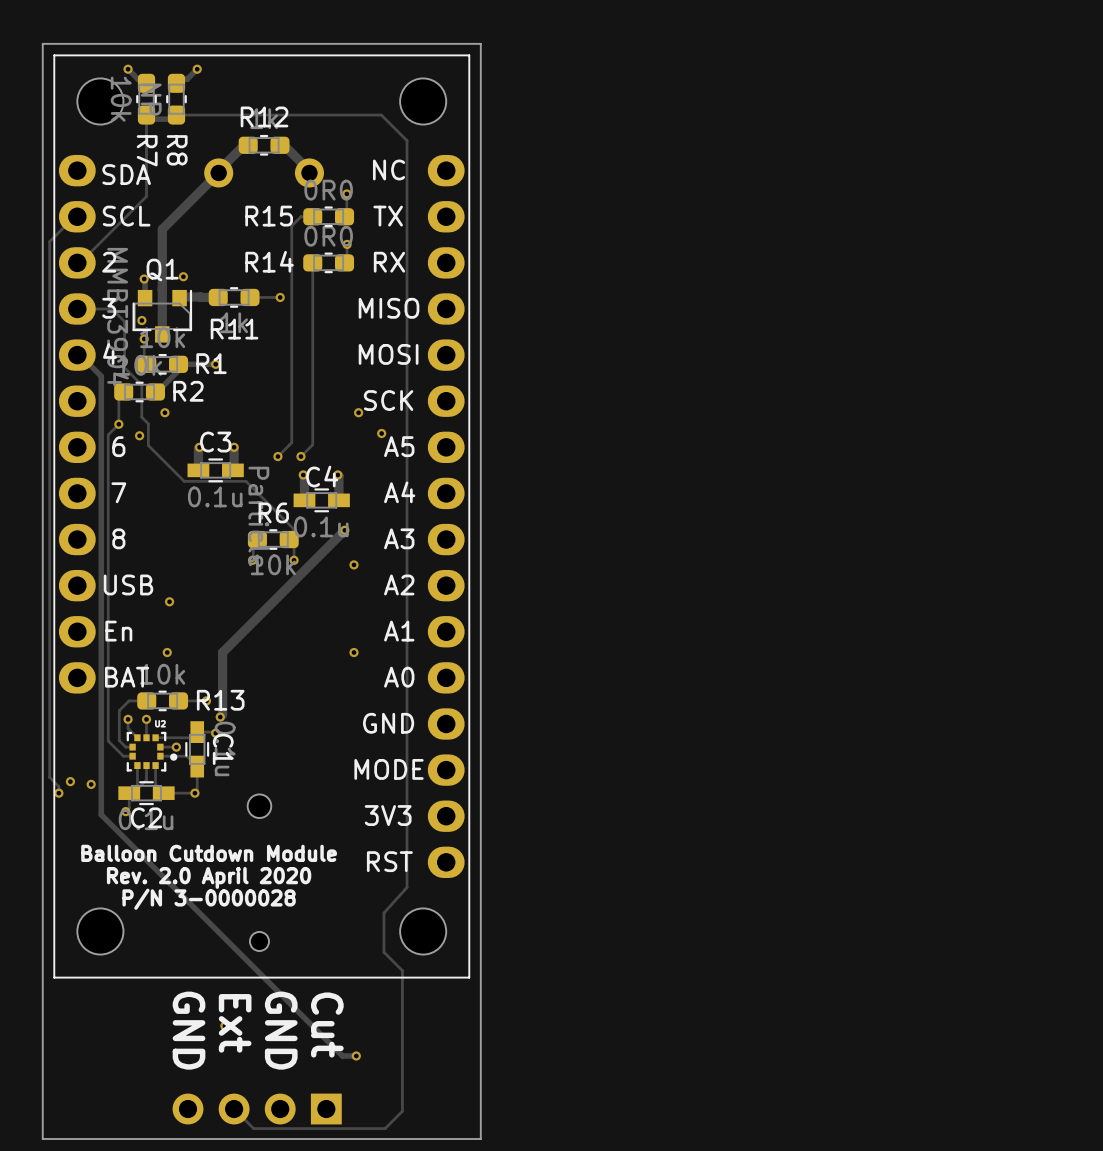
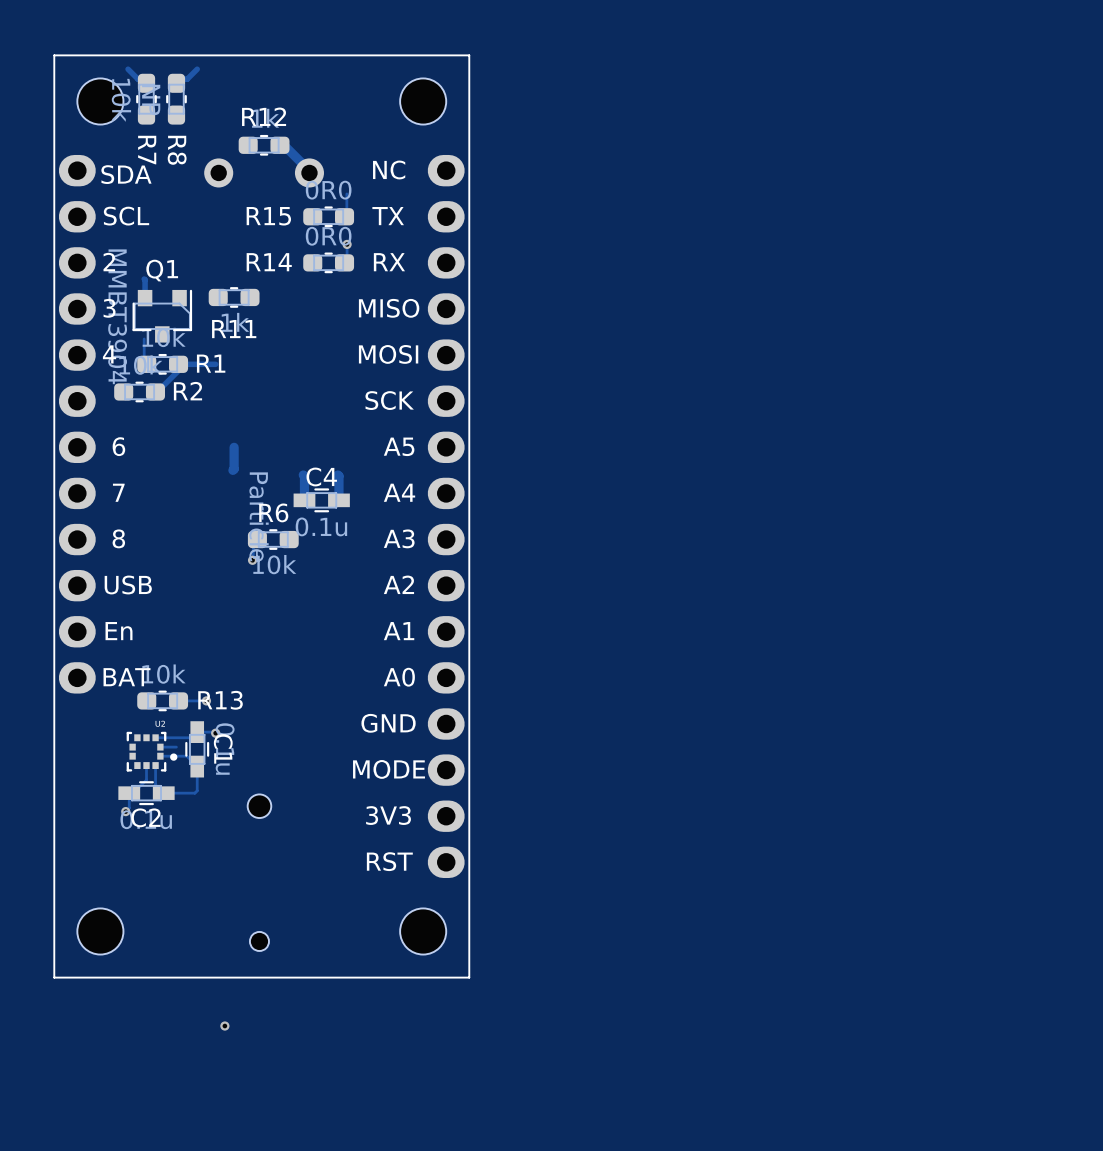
board edge: (480, 43) (480, 1138) (42, 1138) (42, 43) (480, 43) -> none
via: (128, 69) -> none
via: (197, 69) -> none
track: (176, 115) (381, 115) (407, 140) (407, 887) (383, 913) (383, 952) (402, 970) (402, 1111) (385, 1128) (253, 1128) (234, 1109) -> none
track: (176, 119) (146, 119) (146, 196) (80, 262) (77, 262) -> none
track: (244, 145) (162, 229) (162, 334) -> none
via: (346, 193) -> none
track: (77, 216) (74, 216) (49, 241) (49, 777) (58, 786) (58, 793) -> none
track: (312, 216) (300, 216) (291, 225) (291, 442) (277, 456) -> none
track: (312, 262) (312, 444) (300, 456) -> none
via: (183, 276) -> none
via: (144, 279) -> none
track: (214, 297) (179, 298) -> none
track: (280, 297) (254, 297) -> none
via: (280, 297) -> none
track: (77, 308) (111, 308) (124, 321) (124, 367) (141, 384) (141, 417) (148, 423) (148, 445) (184, 481) (246, 481) (293, 528) (294, 560) -> none
via: (141, 320) -> none
via: (144, 338) -> none
track: (77, 355) (80, 355) (101, 376) (101, 814) (342, 1055) (356, 1055) -> none
via: (215, 364) -> none
track: (119, 389) (118, 424) (108, 434) (108, 741) (123, 756) (132, 756) -> none
via: (164, 412) -> none
via: (358, 412) -> none
via: (118, 424) -> none
via: (381, 433) -> none
via: (139, 435) -> none
track: (199, 447) (198, 465) -> none
via: (199, 447) -> none
via: (234, 447) -> none
via: (277, 456) -> none
via: (300, 456) -> none
C3: 0.1u (215, 470) -> none
via: (303, 474) -> none
via: (337, 474) -> none
track: (344, 530) (222, 652) (222, 714) (220, 717) -> none
via: (344, 530) -> none
via: (294, 560) -> none
via: (354, 564) -> none
via: (169, 601) -> none
via: (167, 652) -> none
via: (354, 652) -> none
track: (142, 700) (129, 700) (119, 710) (119, 740) (125, 747) (132, 747) -> none
via: (220, 717) -> none
track: (128, 719) (128, 728) (137, 737) -> none
via: (128, 719) -> none
track: (146, 719) (146, 737) -> none
via: (146, 719) -> none
via: (176, 747) -> none
track: (137, 765) (137, 784) (129, 793) -> none
via: (70, 781) -> none
via: (91, 784) -> none
via: (58, 793) -> none
via: (194, 793) -> none
text: Balloon Cutdown Module (209, 853) -> none
text: Rev. 2.0 April 2020 (209, 877) -> none
text: P/N 3-0000028 (209, 899) -> none
text: Ext (235, 1023) -> none
text: Cut (327, 1025) -> none
text: GND (189, 1030) -> none
text: GND (281, 1030) -> none
via: (356, 1055) -> none
part: (257, 1109) -> none

